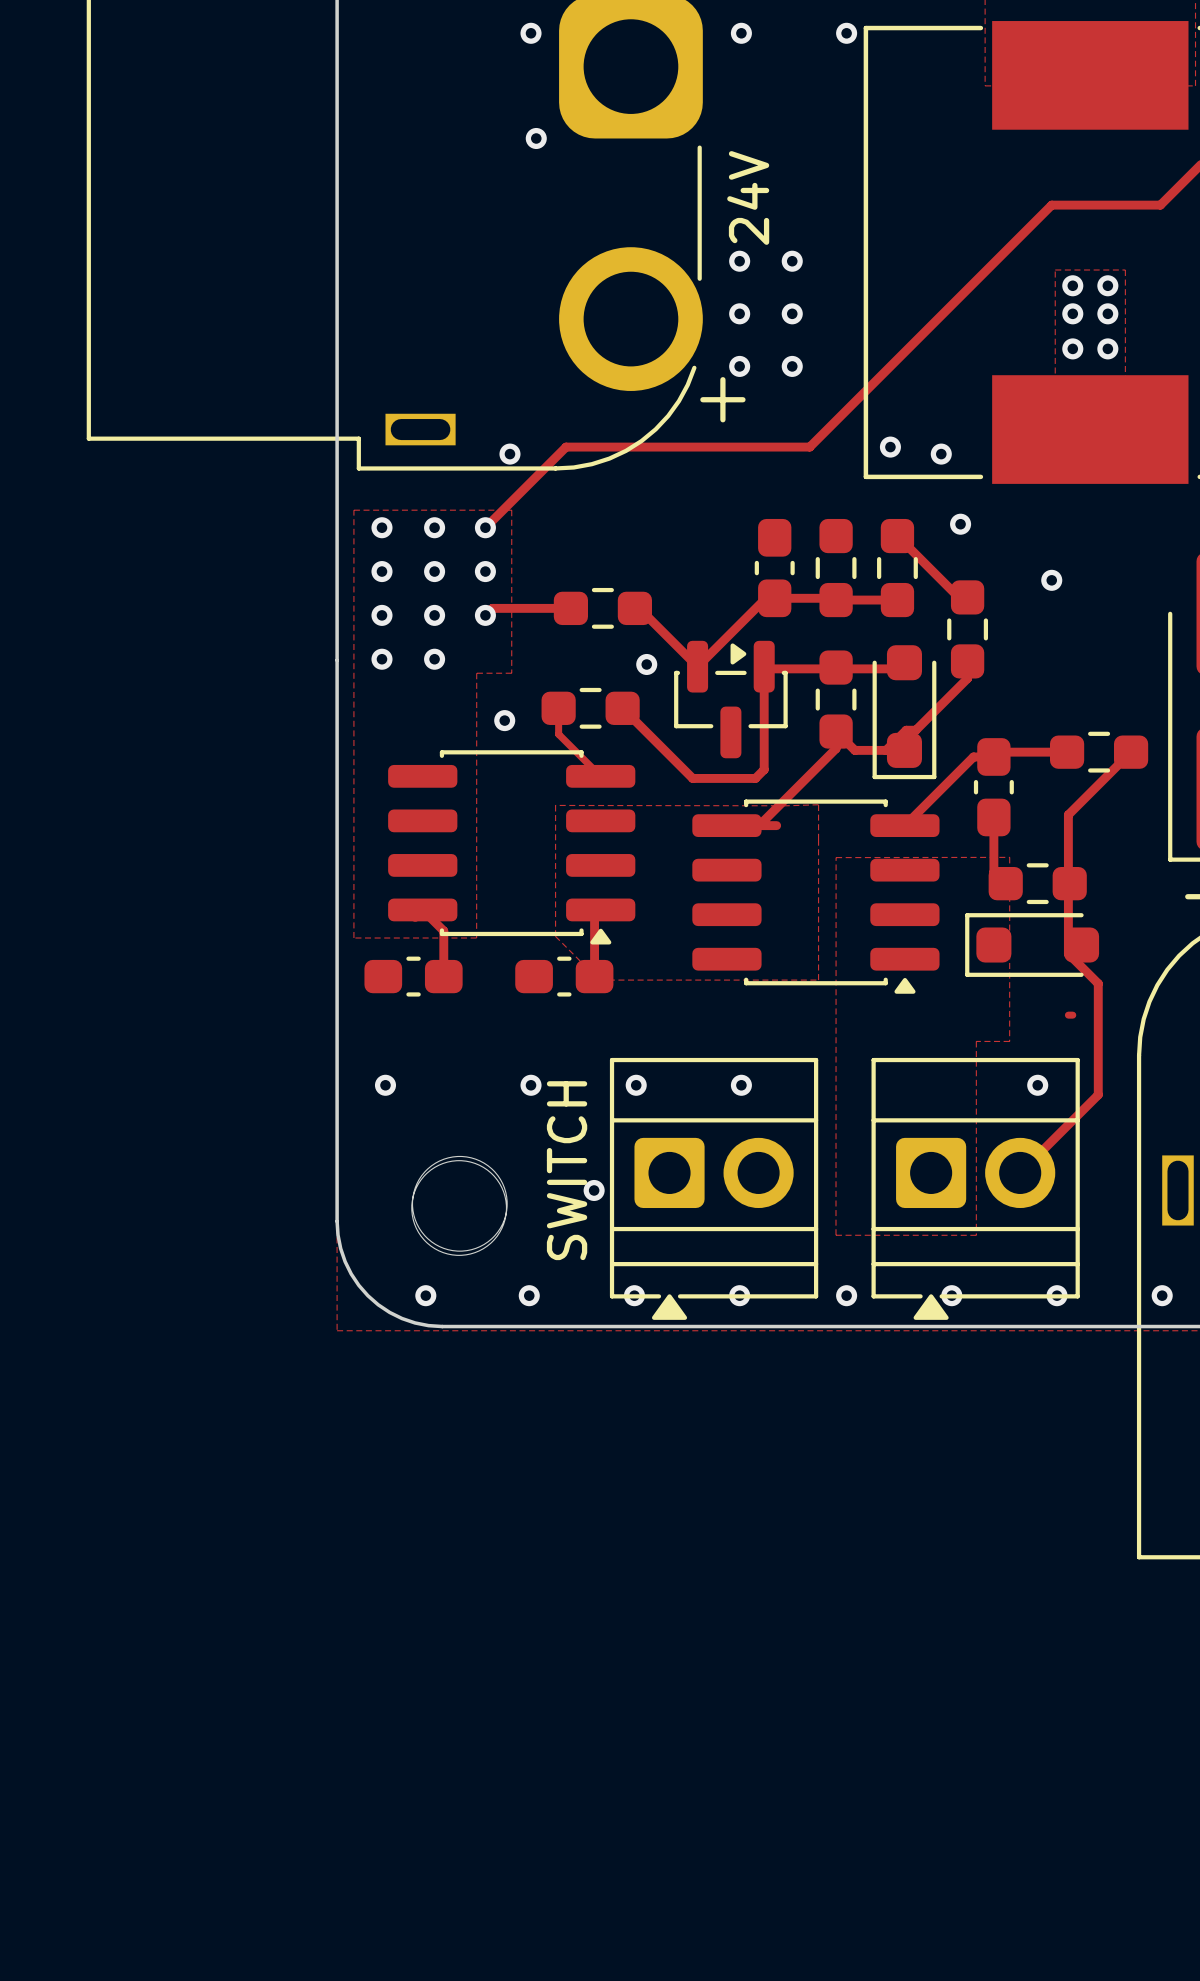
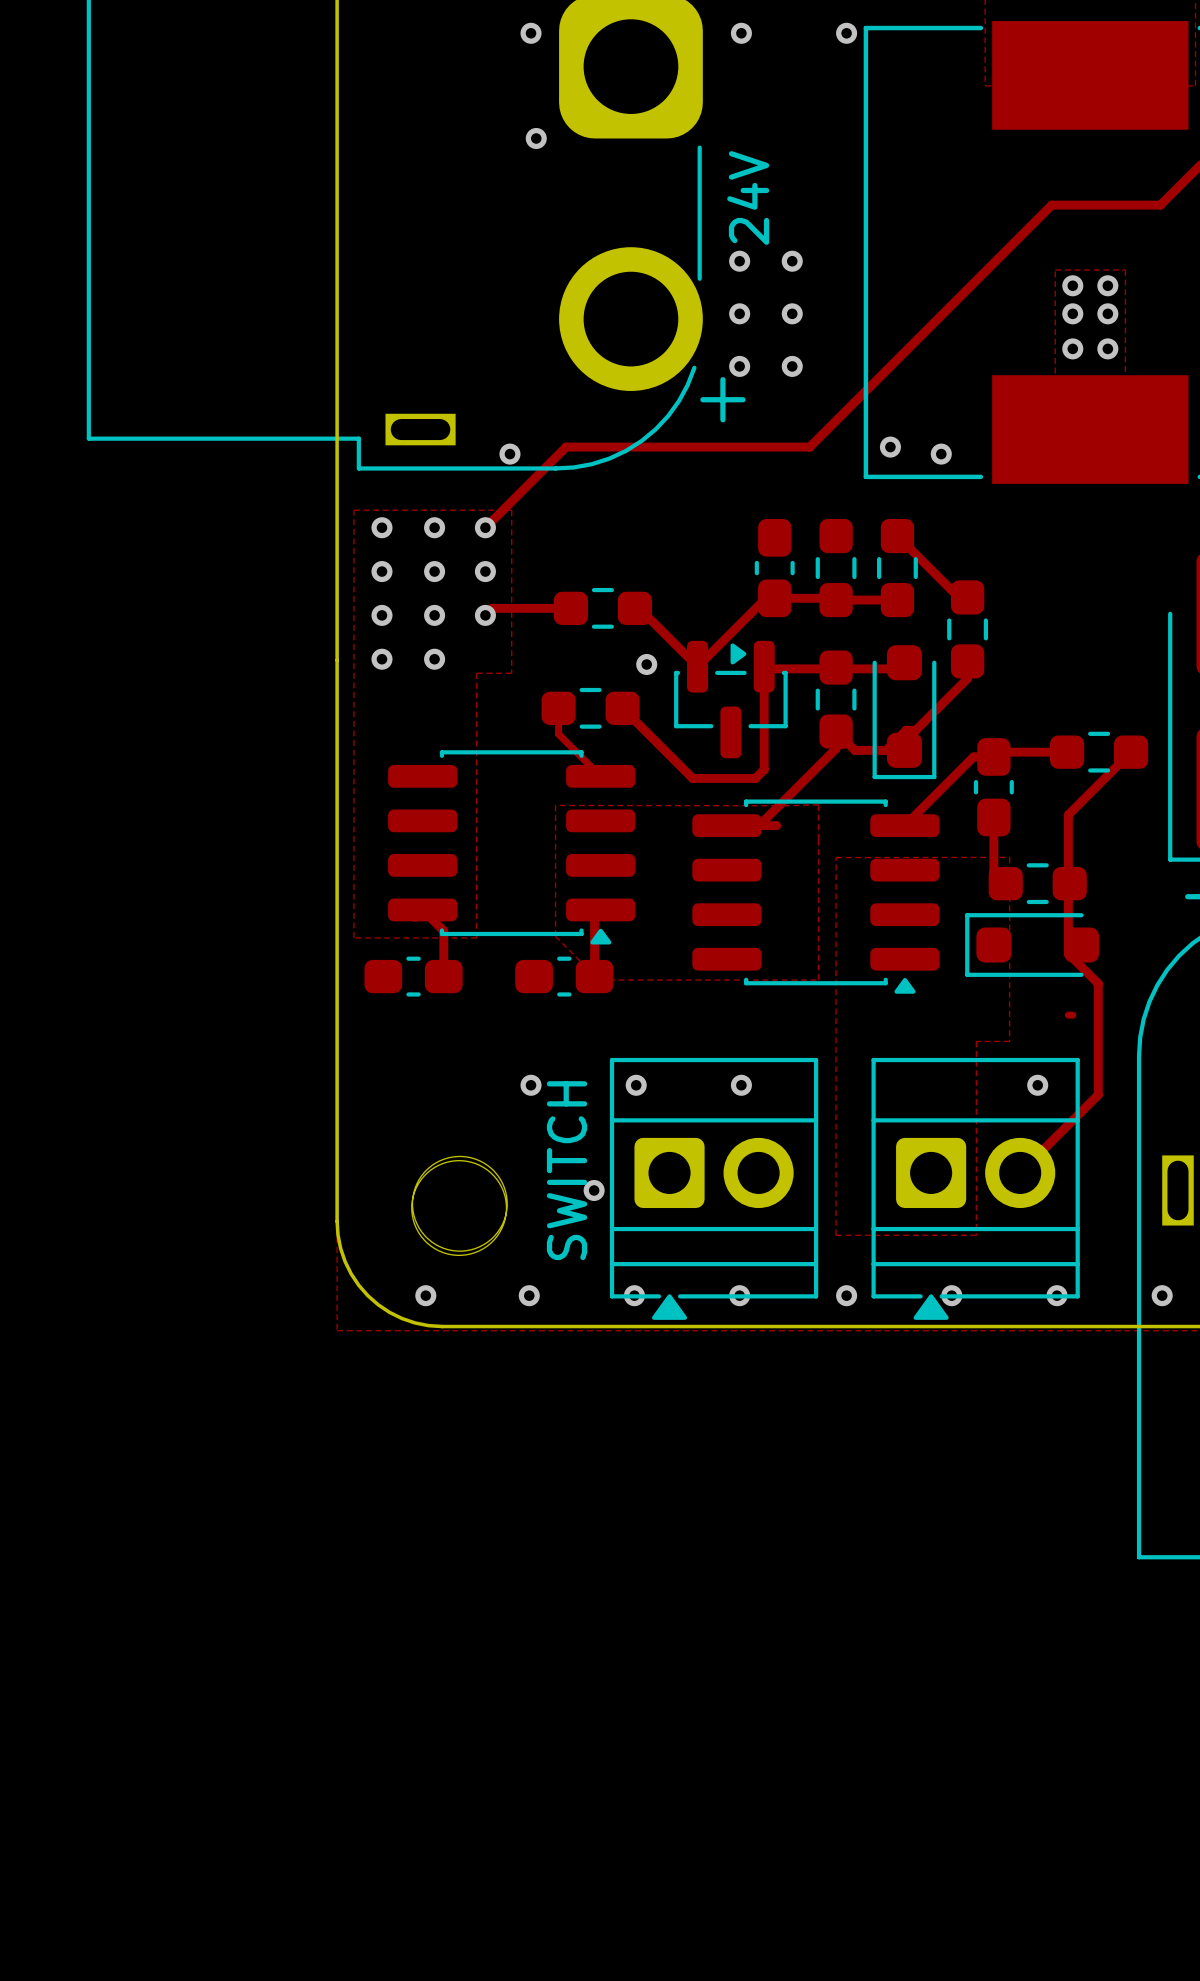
via: (960, 524) -> none
via: (1051, 580) -> none
via: (504, 720) -> none
via: (385, 1085) -> none

